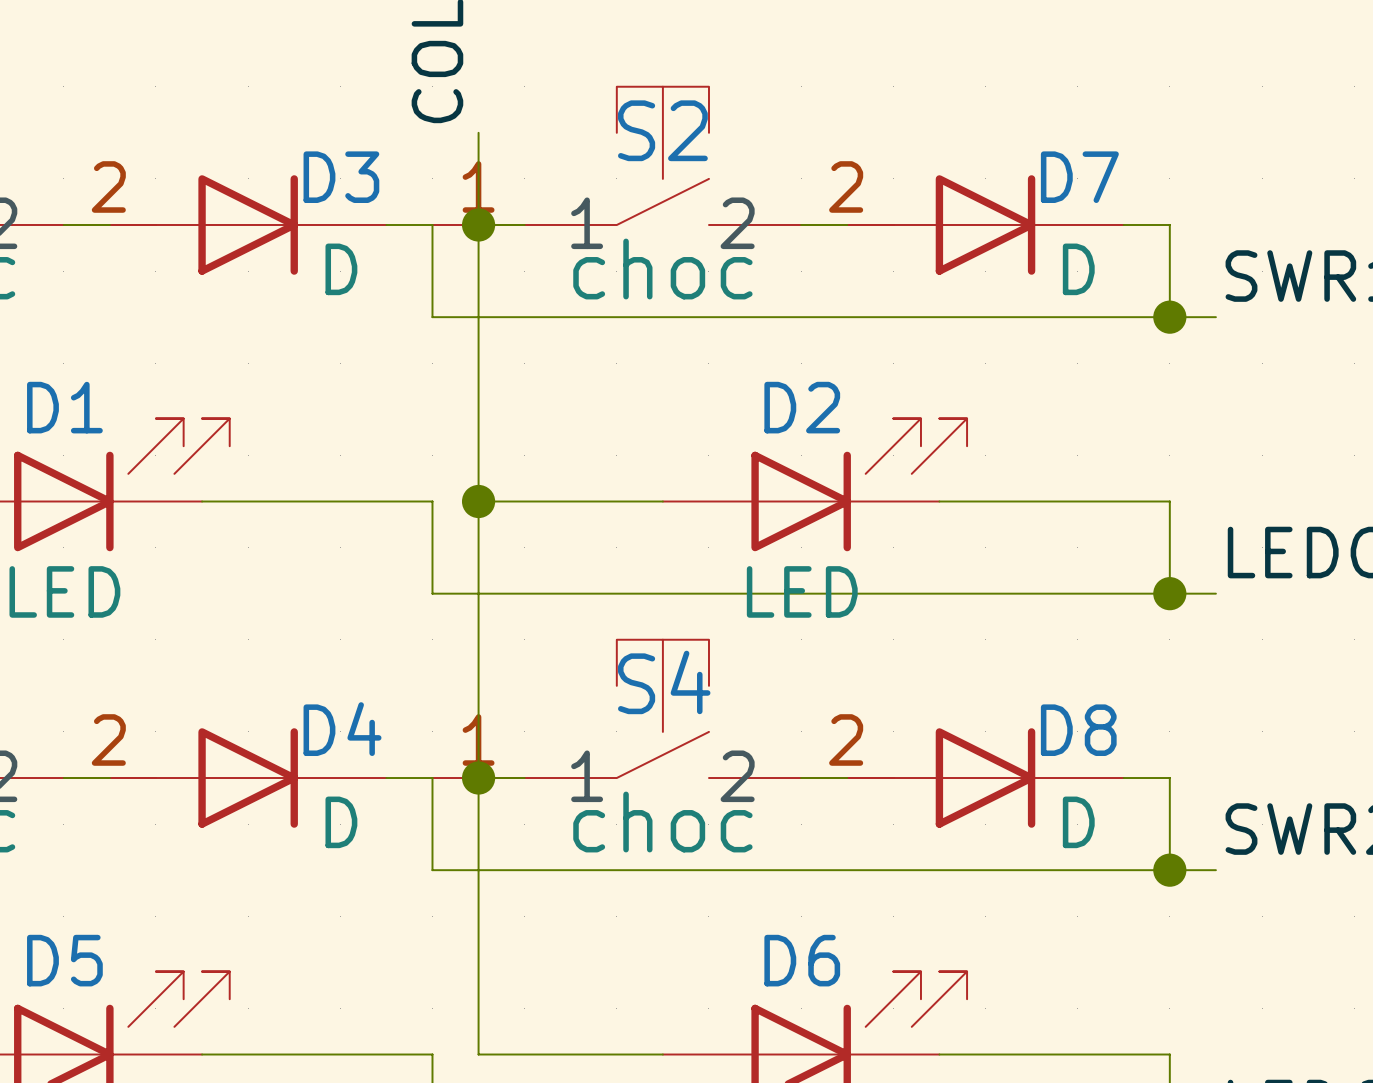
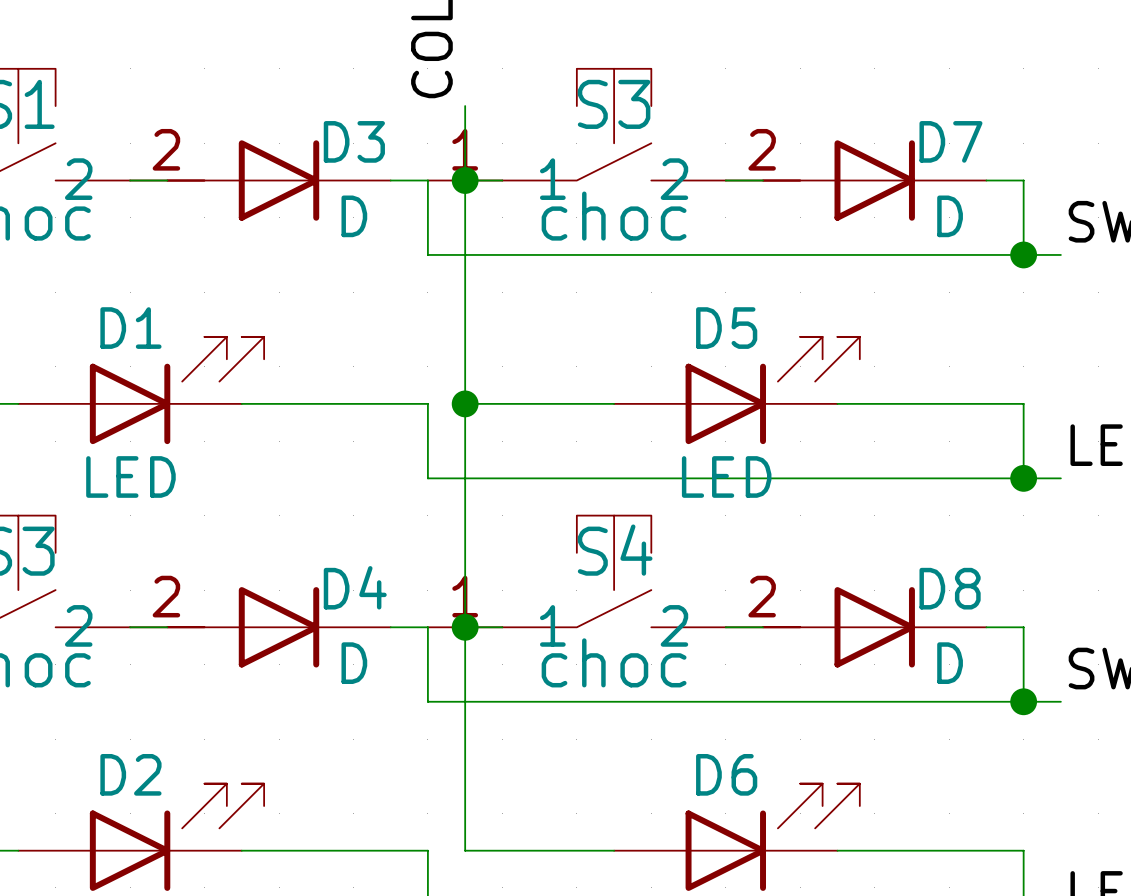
S2 name: S2 (662, 130) -> S3 (614, 104)
D2 name: D2 (802, 407) -> D5 (726, 328)
D5 name: D5 (64, 960) -> D2 (130, 774)

